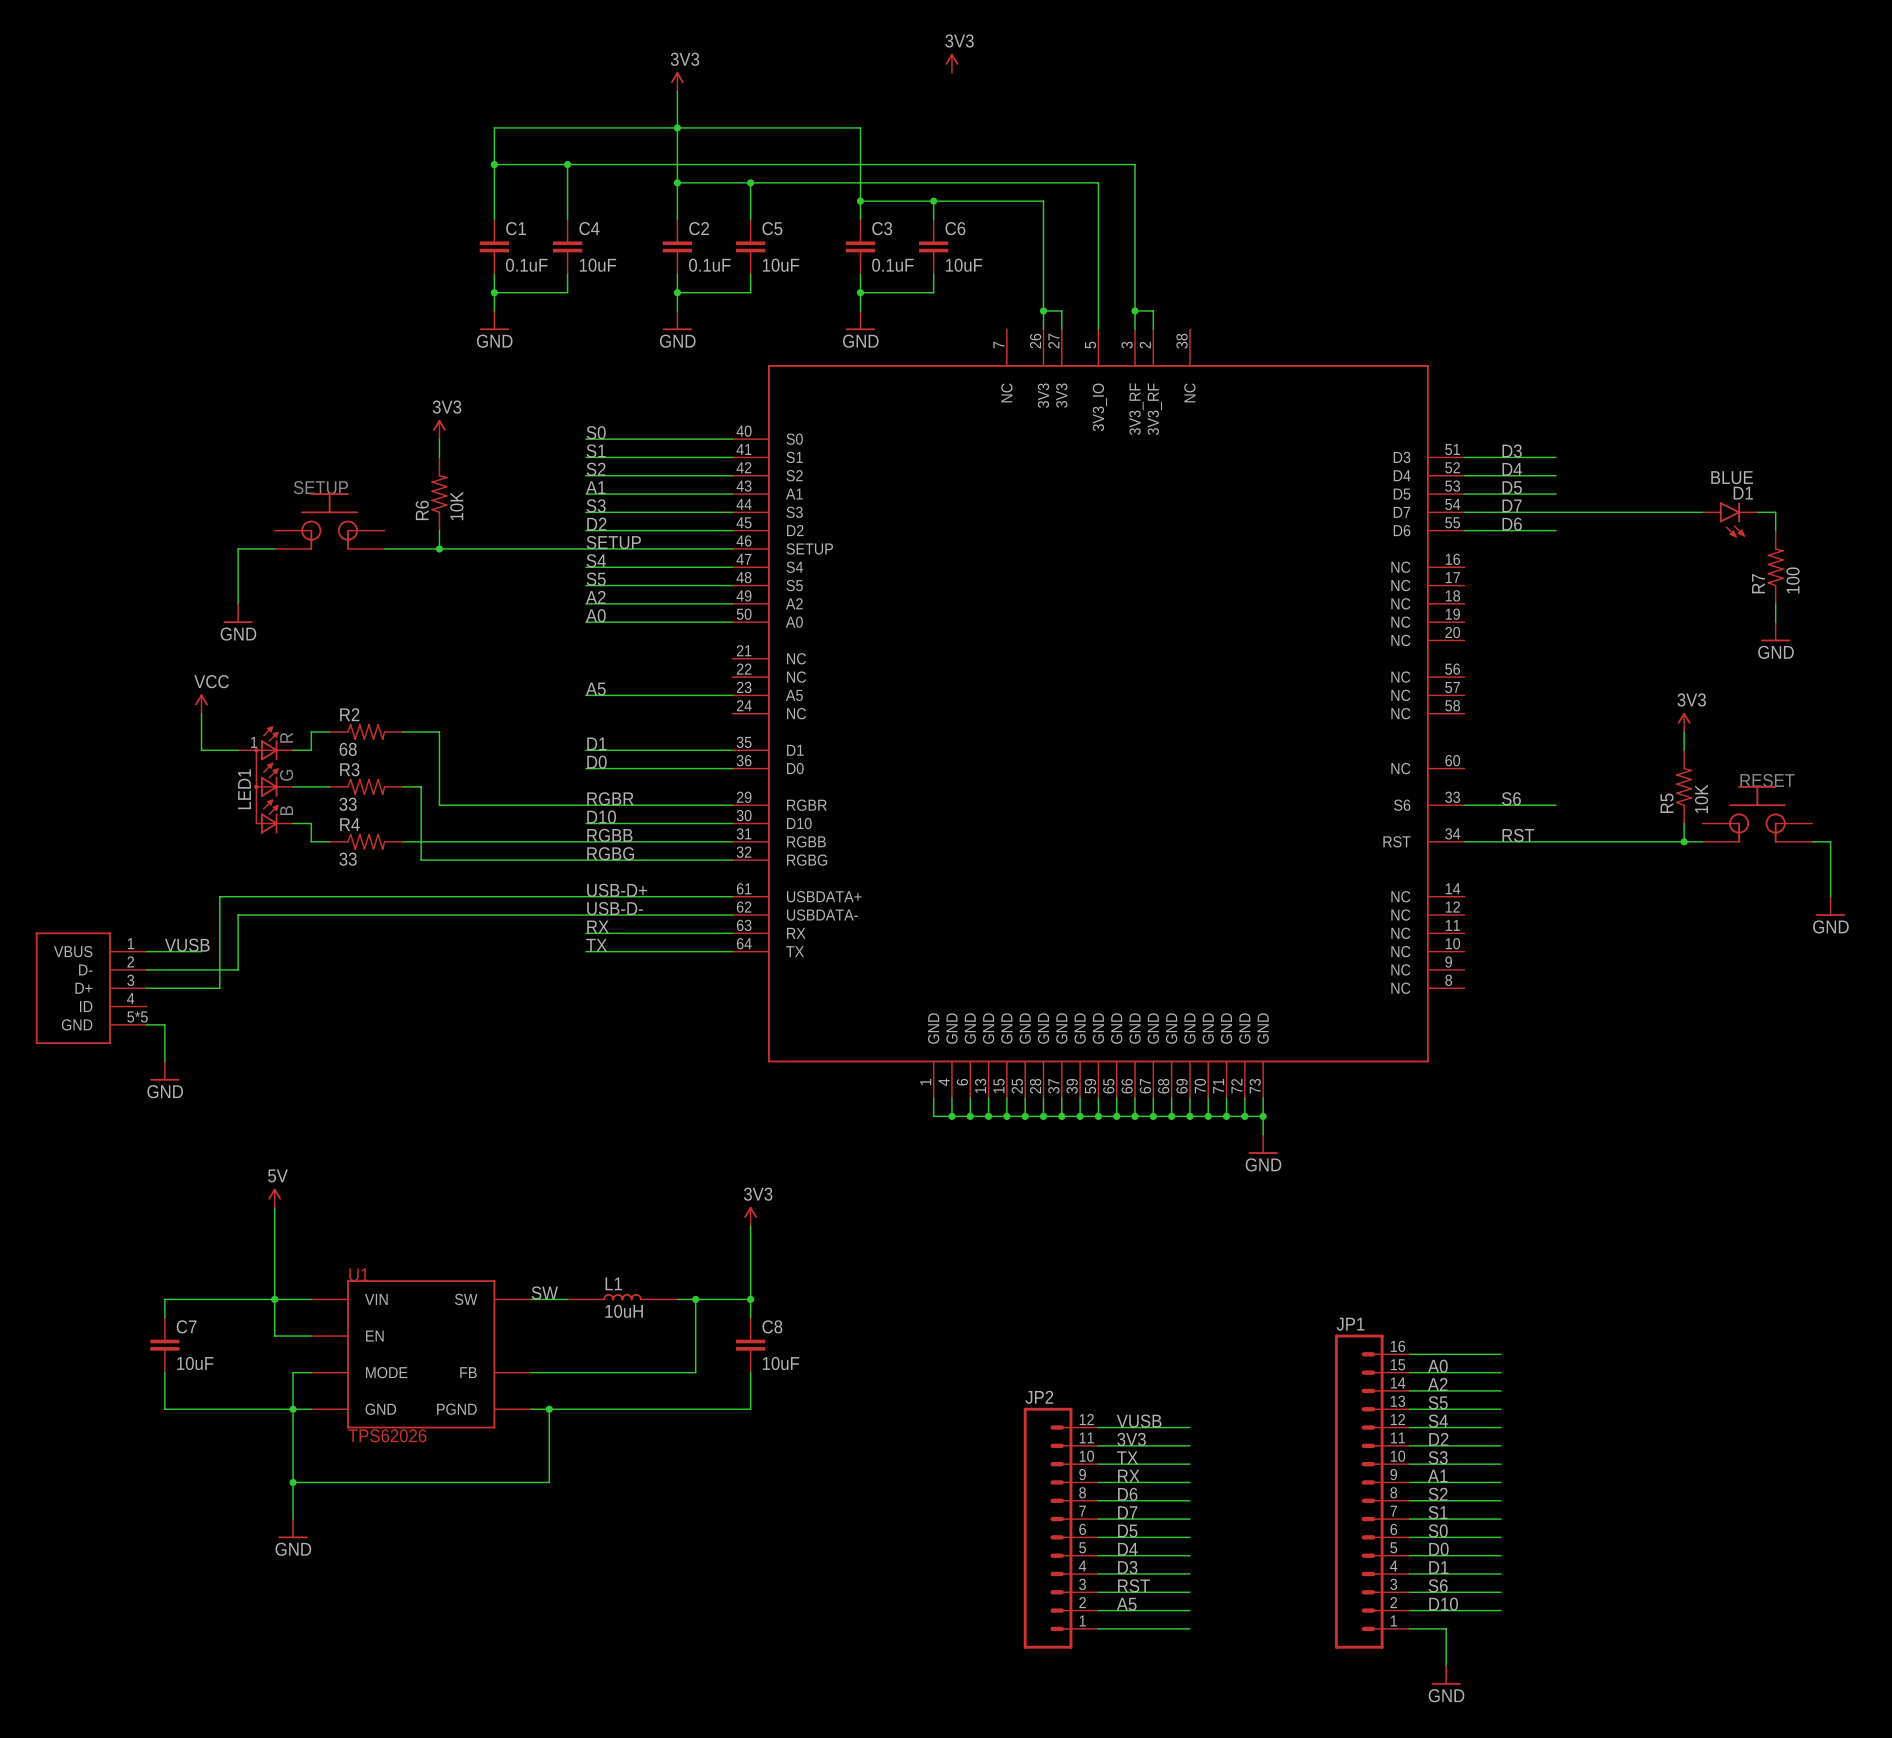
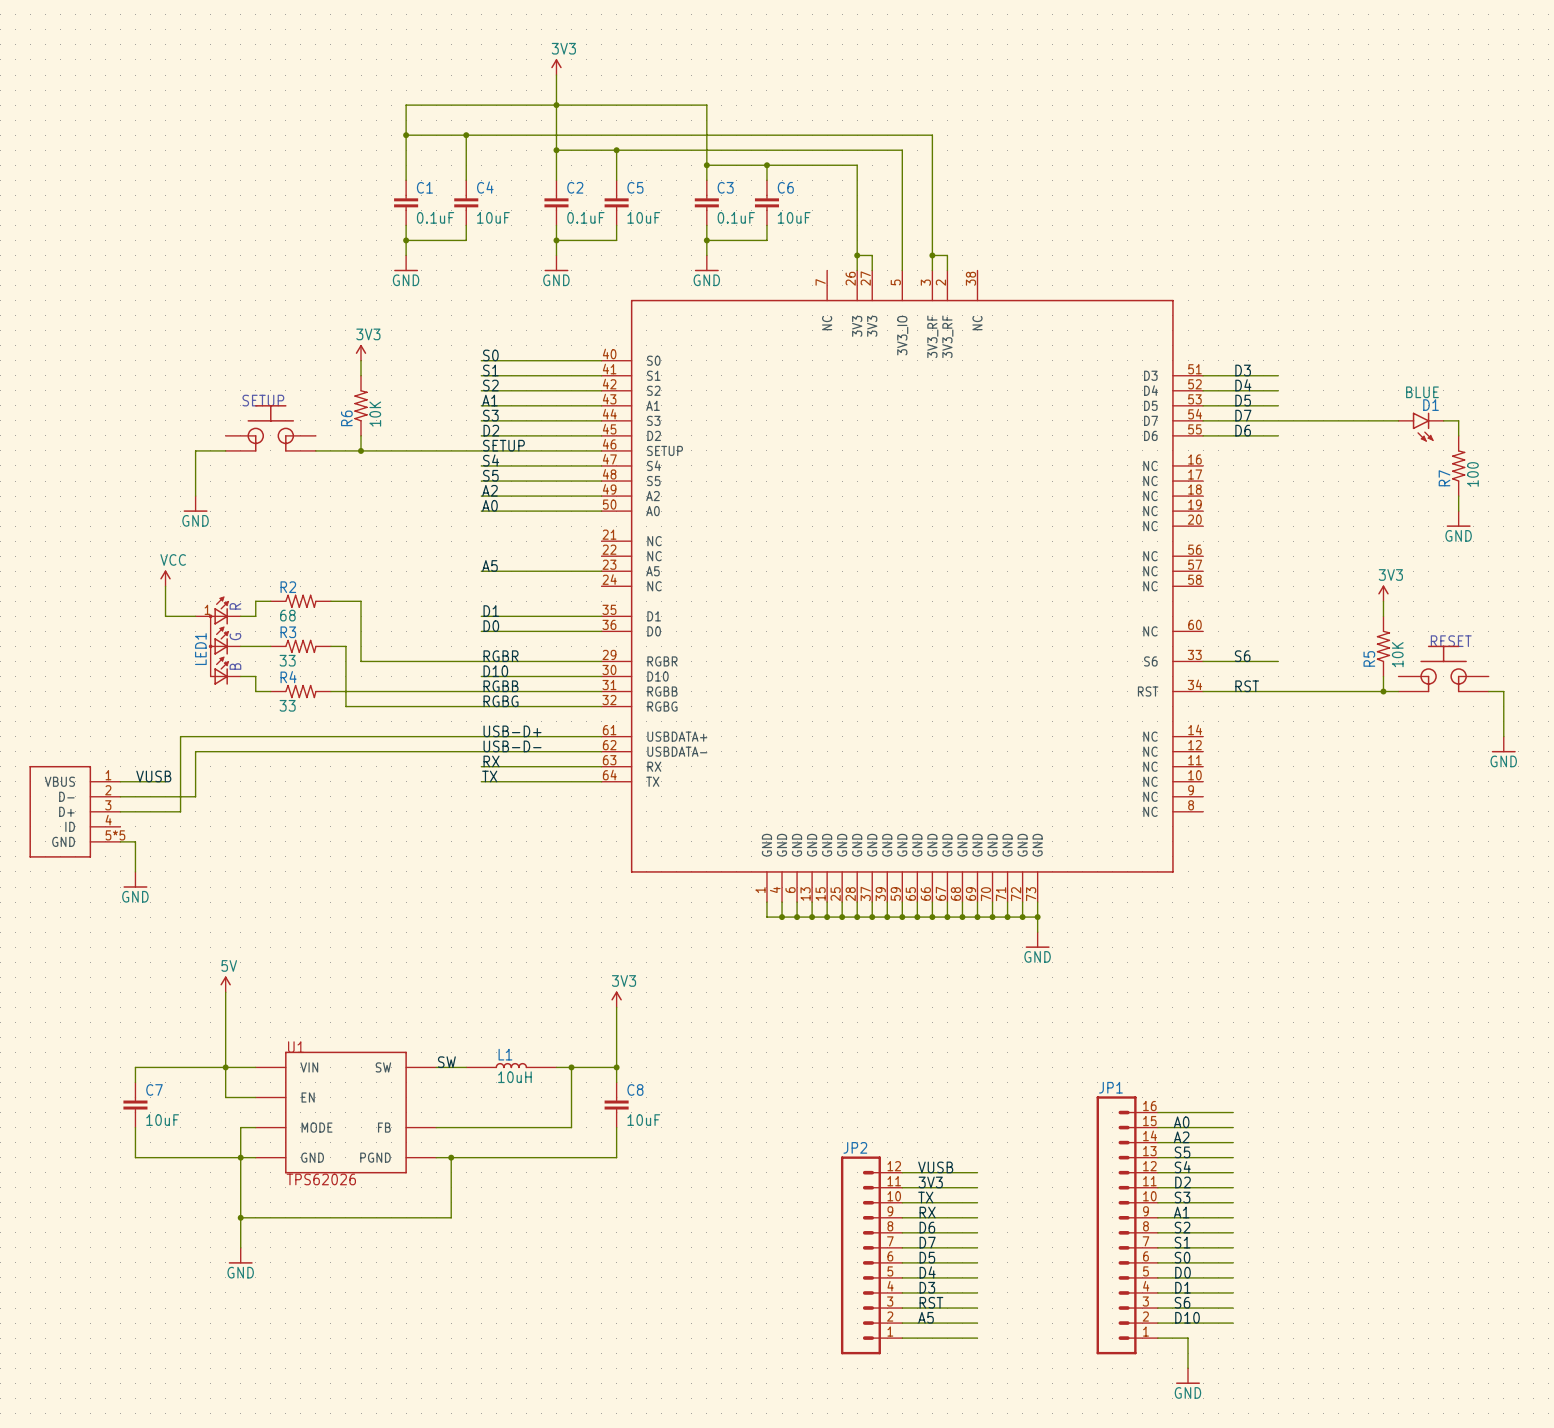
power symbol: 3V3 (951, 63) -> none

